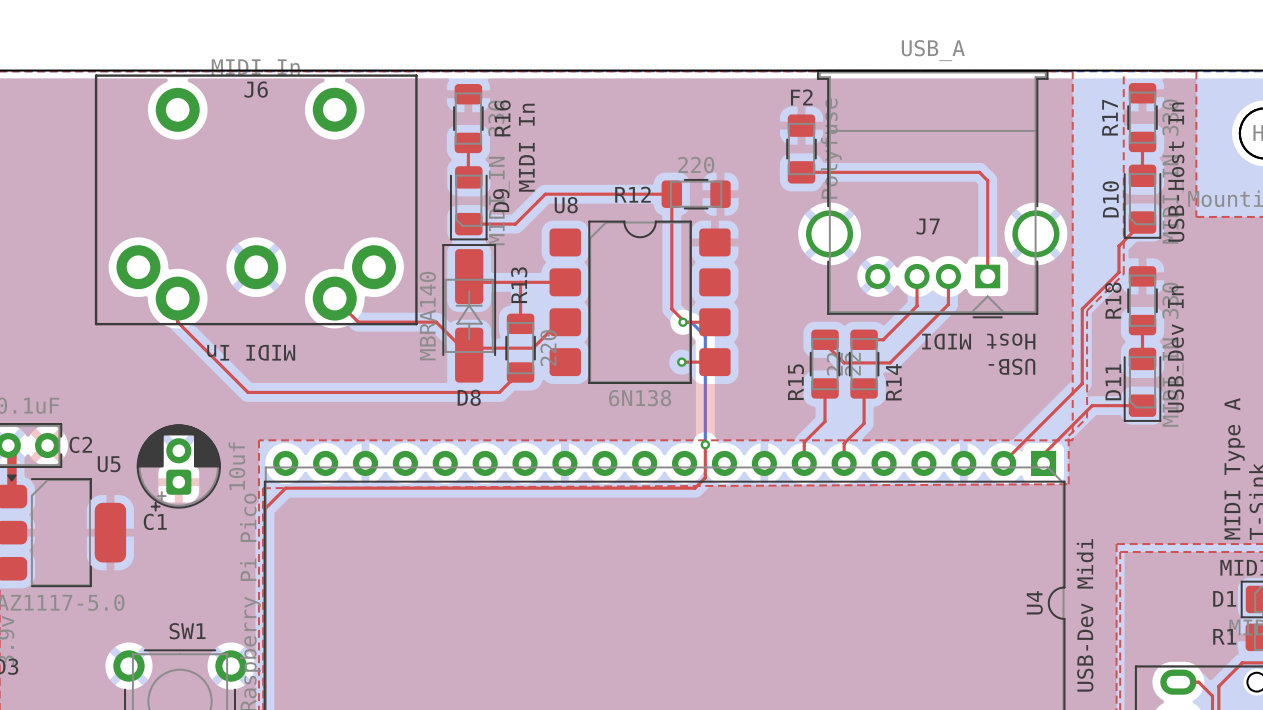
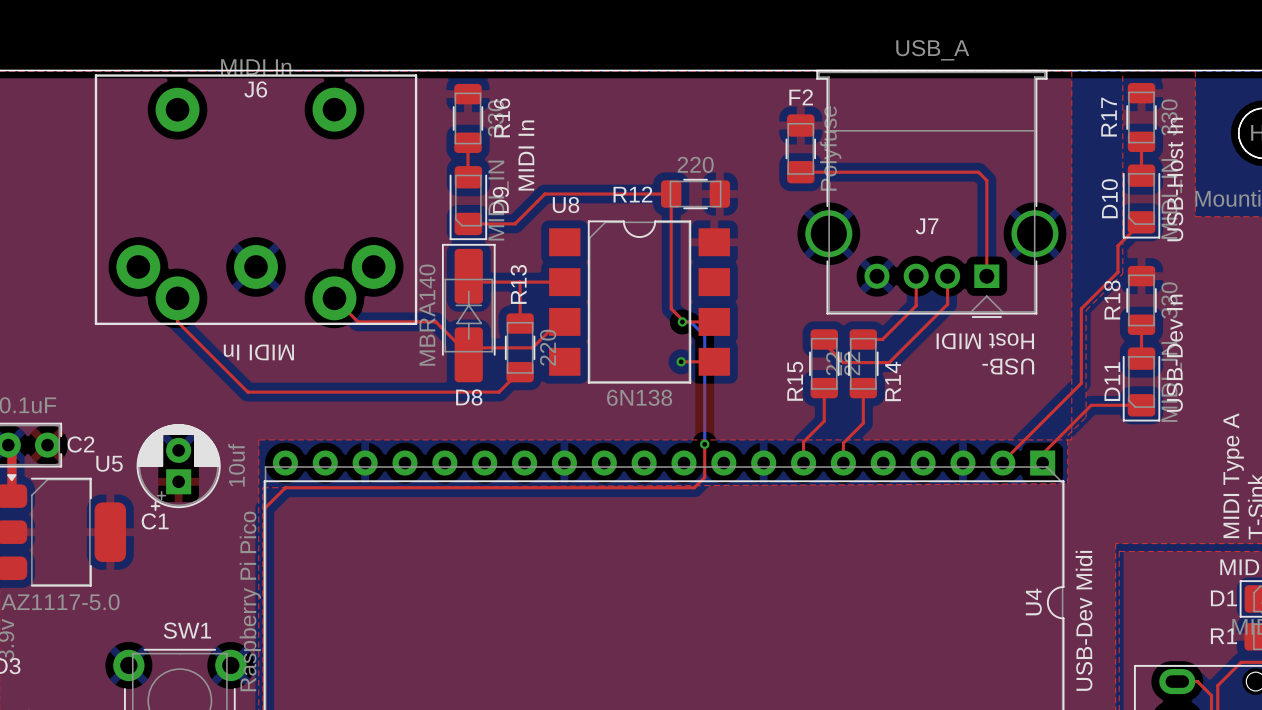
U8 footprint: [549, 220, 731, 384] -> [549, 220, 730, 384]
C1 footprint: [136, 424, 221, 512] -> [136, 424, 221, 512]

